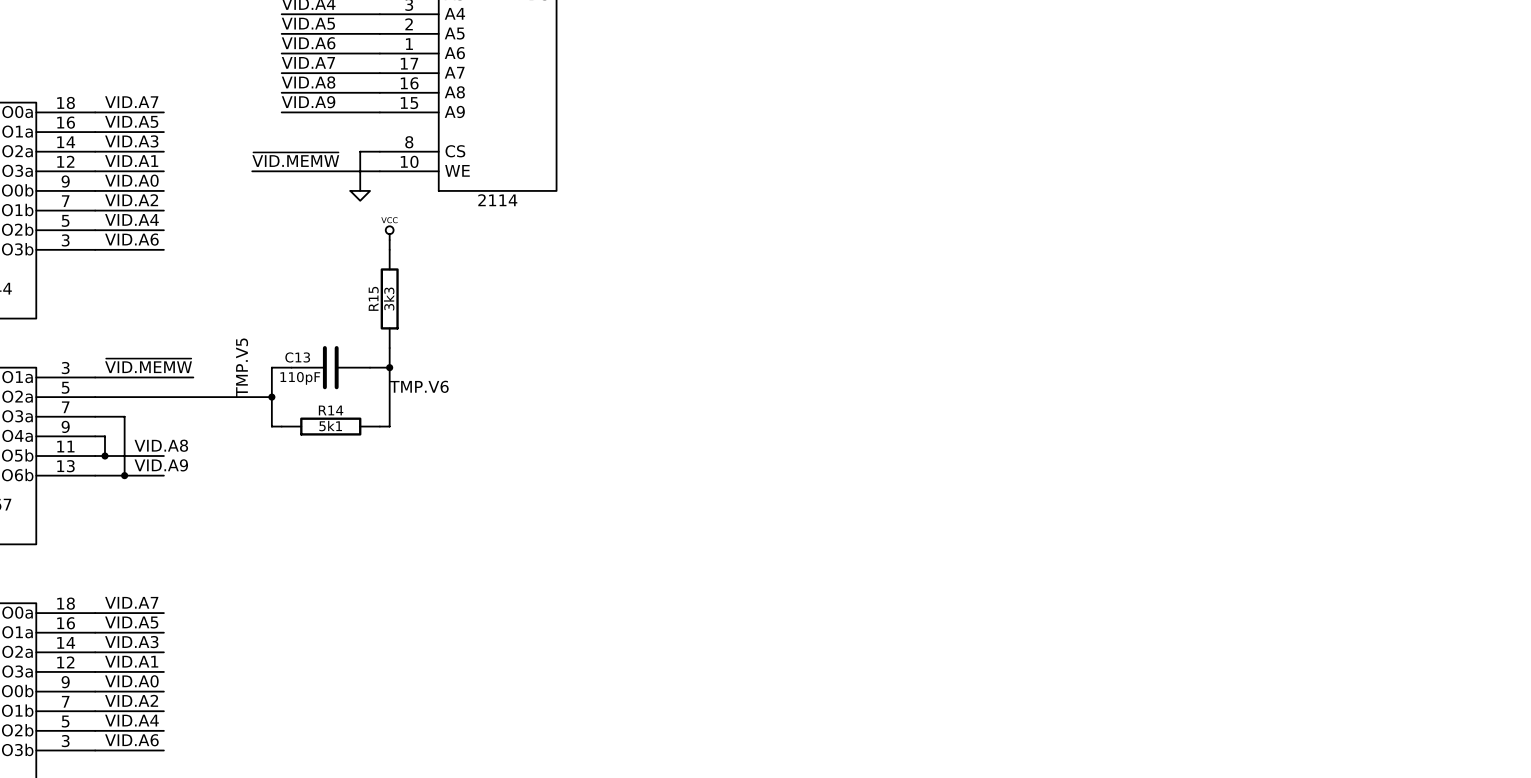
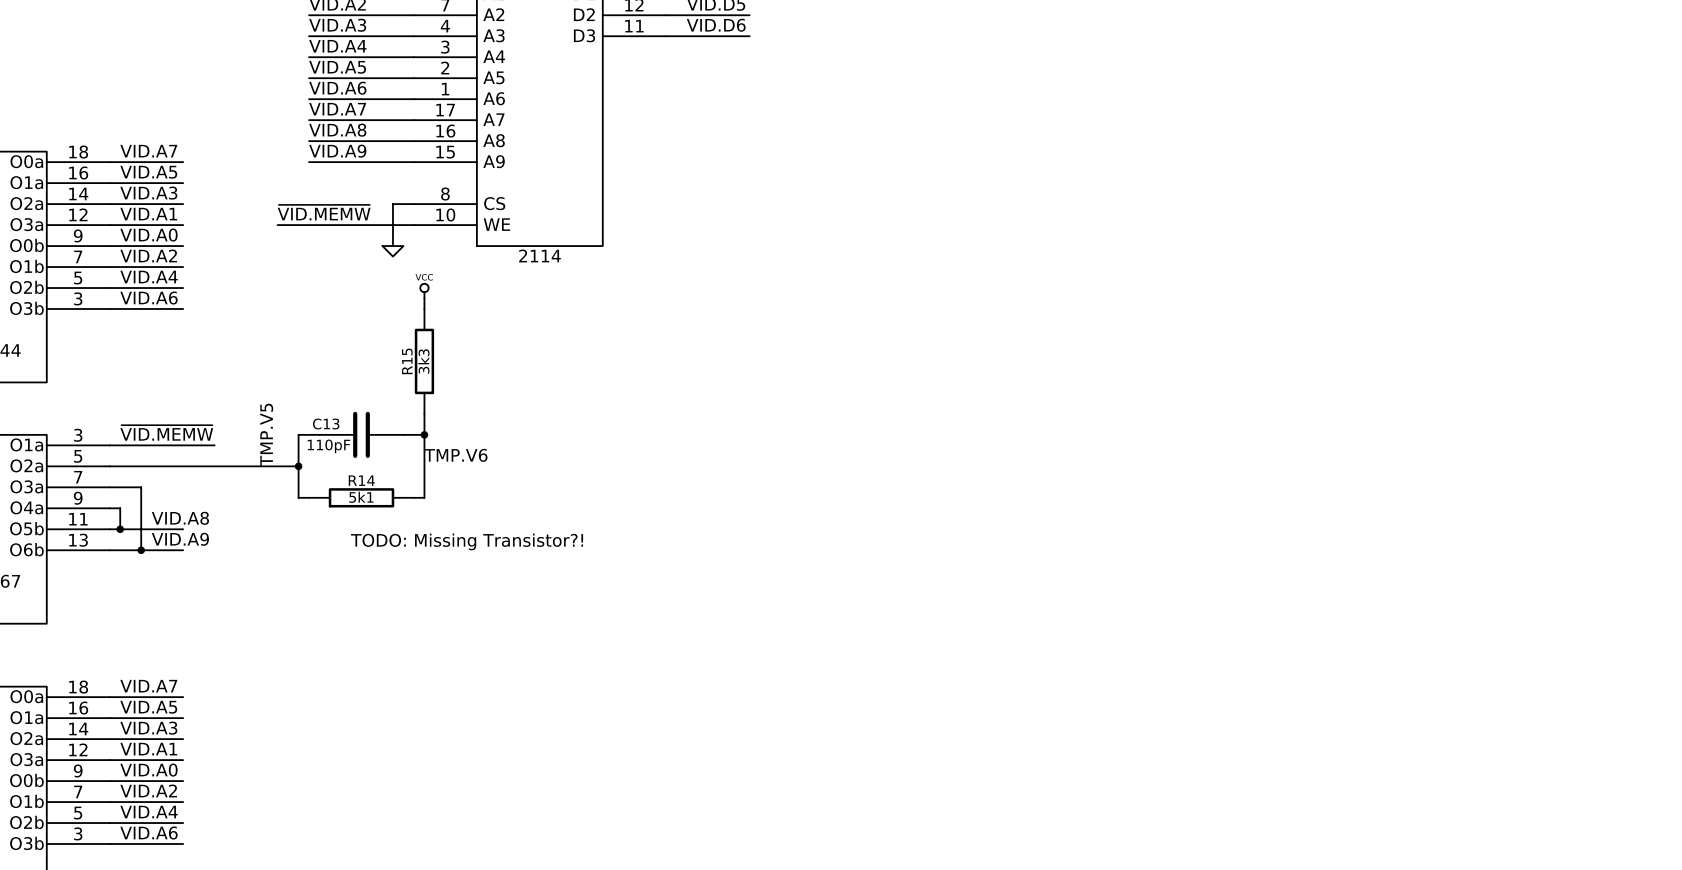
text: none -> TODO: Missing Transistor?! (467, 541)

